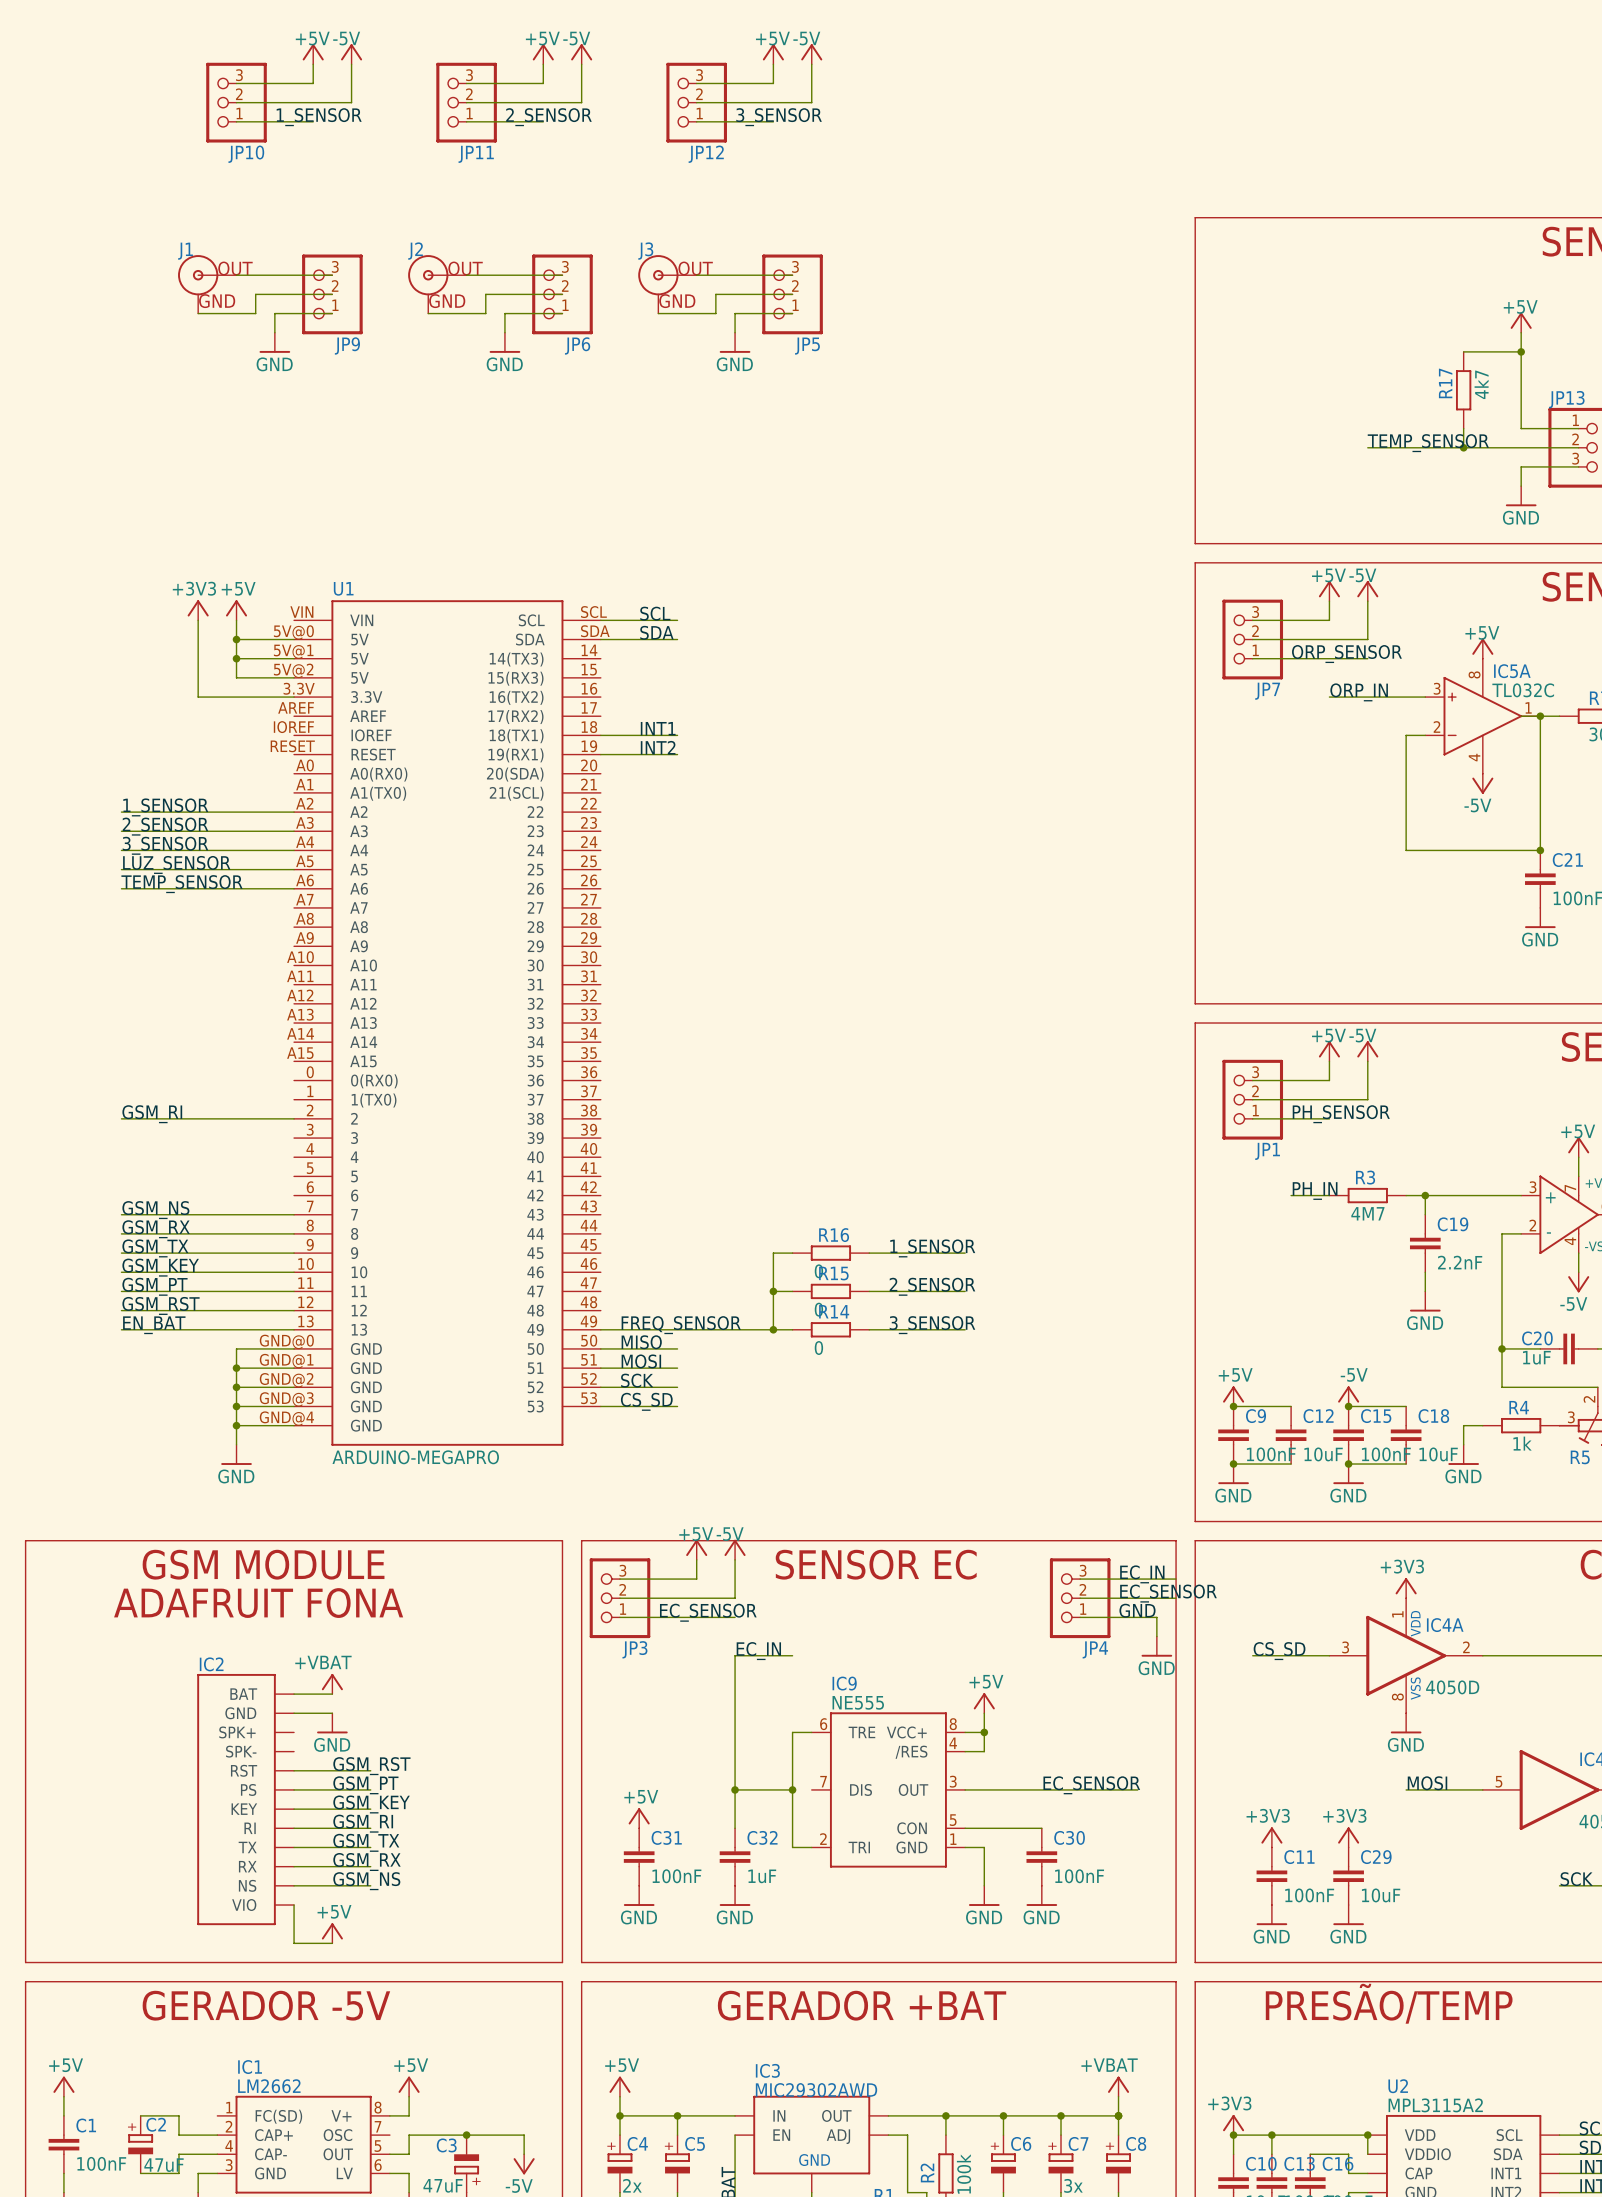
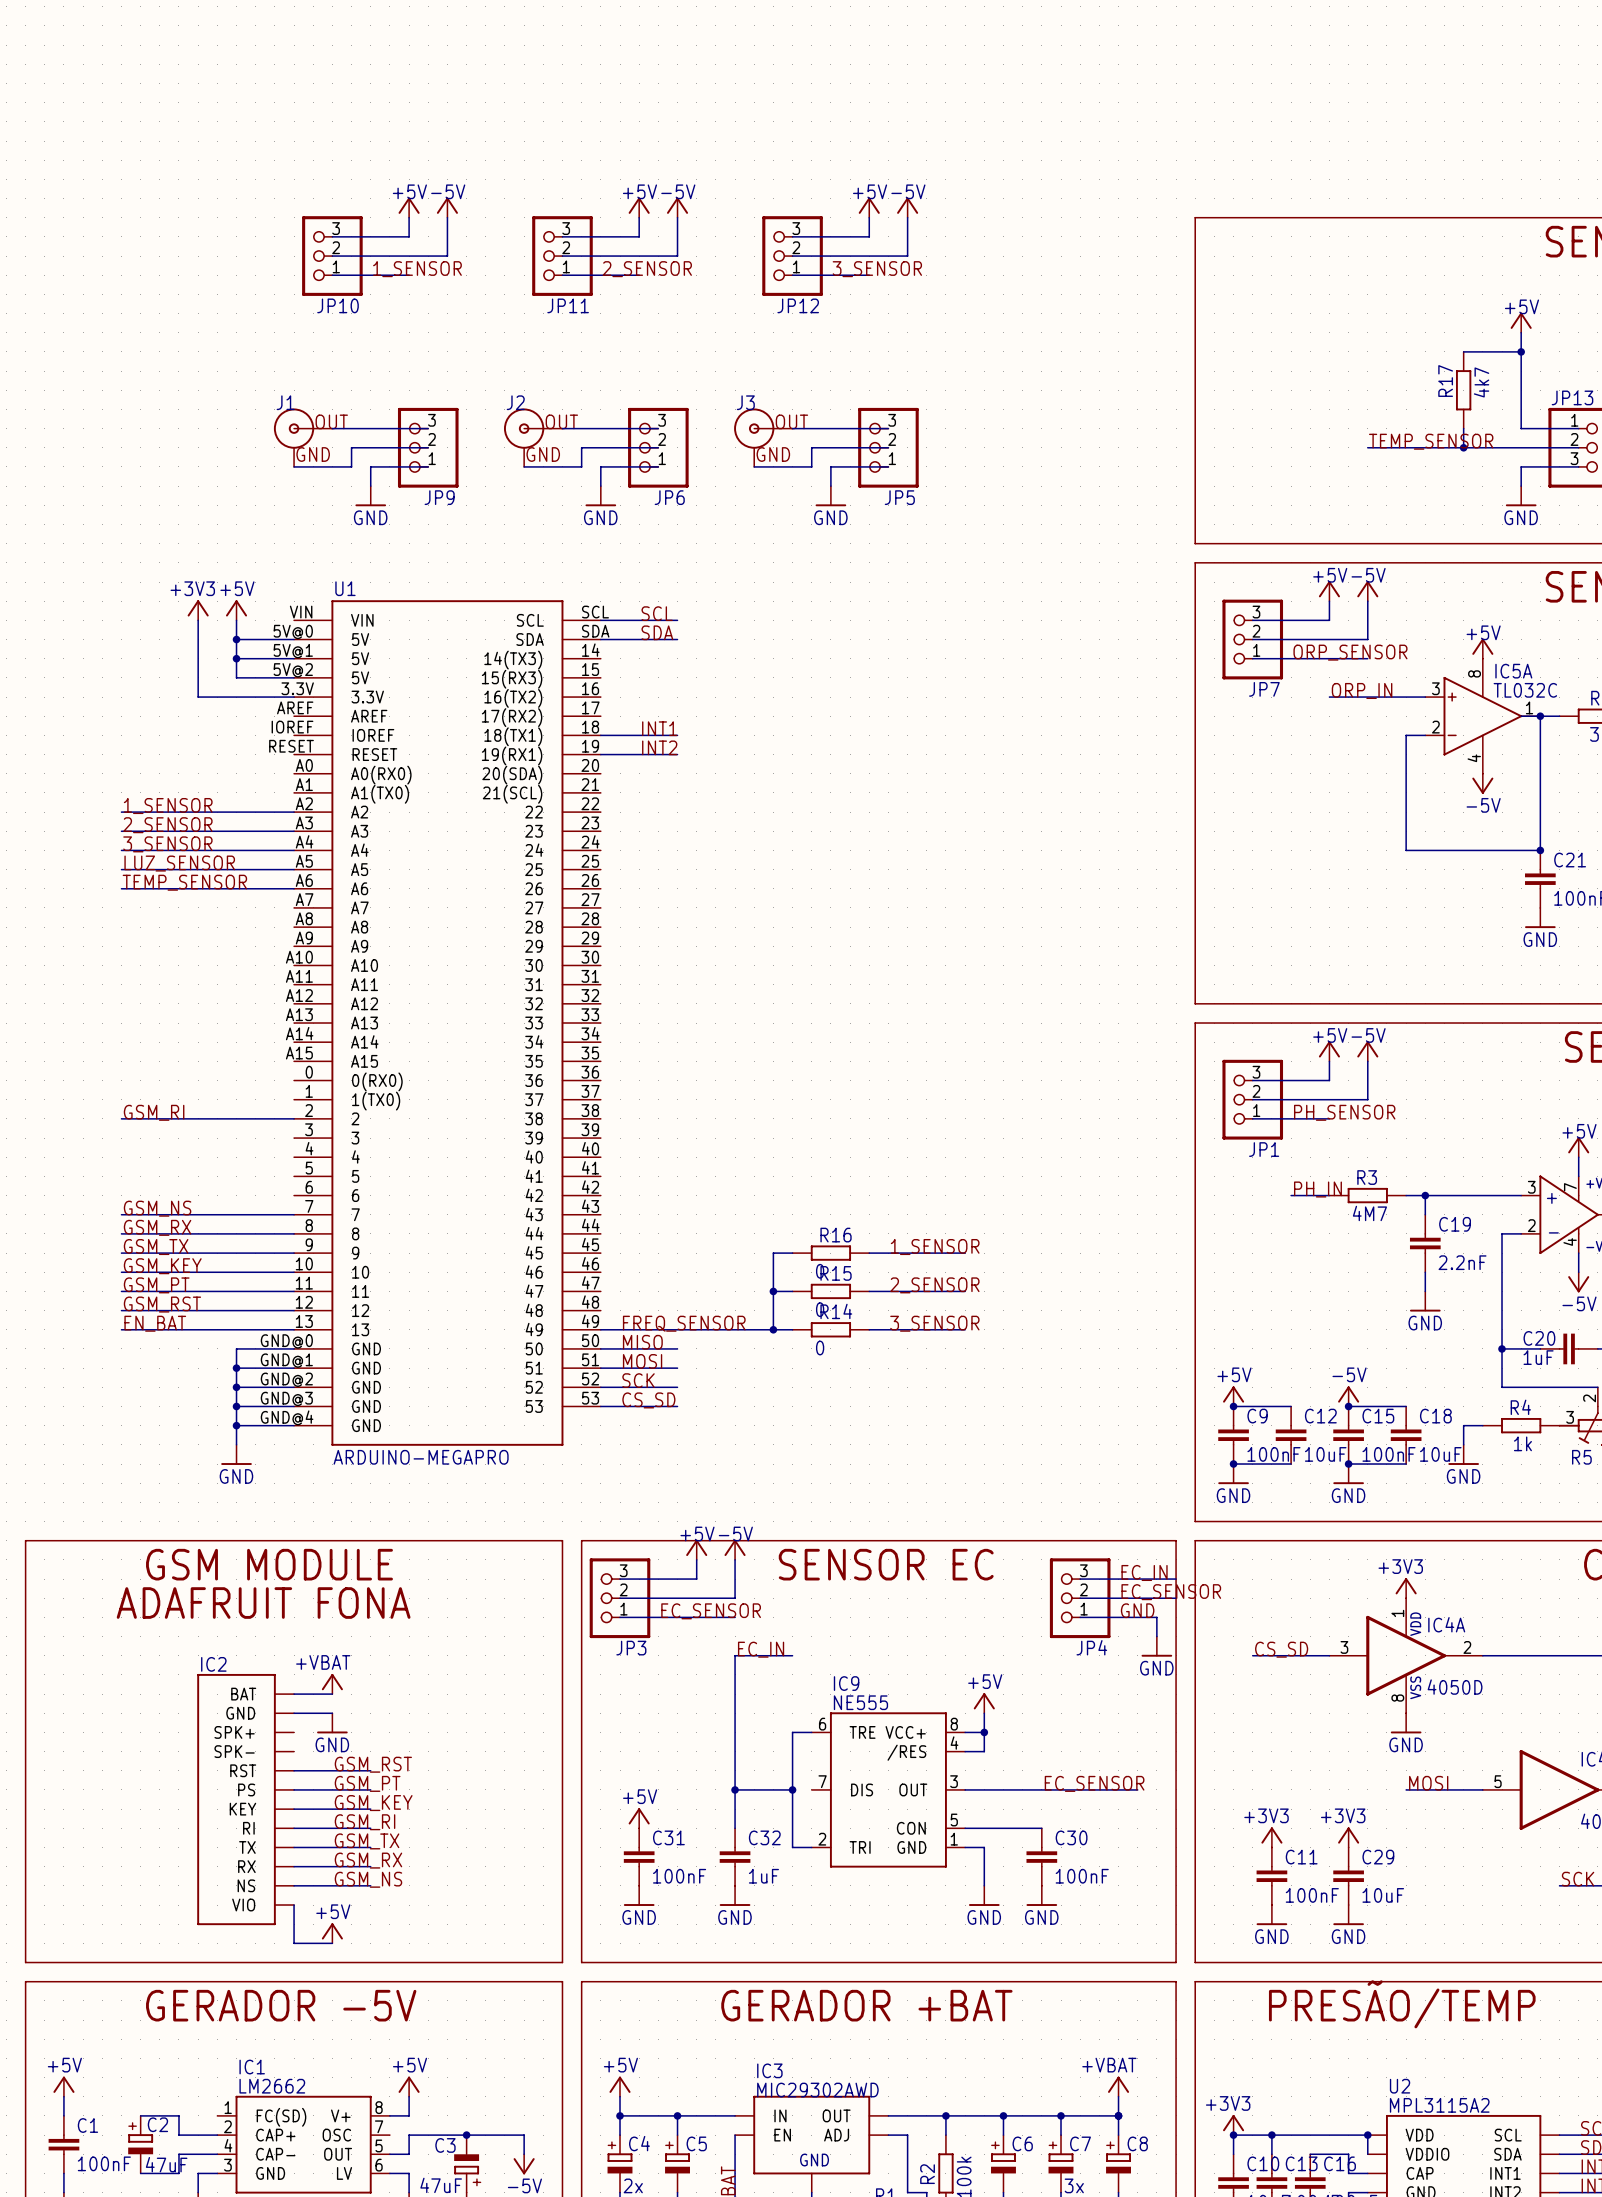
power symbol: +5V (313, 54) -> none
power symbol: -5V (351, 54) -> none
power symbol: +5V (543, 54) -> none
power symbol: -5V (581, 54) -> none
power symbol: +5V (773, 54) -> none
power symbol: -5V (811, 54) -> none
wire: (313, 64) (313, 83) (236, 83) -> (409, 217) (409, 236) (332, 236)
wire: (351, 64) (351, 102) (236, 102) -> (447, 217) (447, 256) (332, 256)
wire: (543, 64) (543, 83) (466, 83) -> (639, 217) (639, 236) (562, 236)
wire: (581, 64) (581, 102) (466, 102) -> (677, 217) (677, 256) (562, 256)
wire: (773, 64) (773, 83) (696, 83) -> (869, 217) (869, 236) (792, 236)
wire: (811, 64) (811, 102) (696, 102) -> (907, 217) (907, 256) (792, 256)
JP10 position: (236, 102) -> (332, 256)
JP11 position: (466, 102) -> (562, 256)
JP12 position: (696, 102) -> (792, 256)
label position: 1_SENSOR (319, 117) -> 1_SENSOR (417, 269)
label position: 2_SENSOR (548, 117) -> 2_SENSOR (647, 269)
label position: 3_SENSOR (779, 117) -> 3_SENSOR (877, 269)
wire: (236, 121) (313, 121) -> none
wire: (466, 121) (543, 121) -> none
wire: (696, 121) (773, 121) -> none
power symbol: none -> +5V (409, 207)
power symbol: none -> -5V (447, 207)
power symbol: none -> +5V (639, 207)
power symbol: none -> -5V (677, 207)
power symbol: none -> +5V (869, 207)
power symbol: none -> -5V (907, 207)
wire: (236, 275) (332, 275) -> (409, 275) (332, 275)
wire: (466, 275) (562, 275) -> (639, 275) (562, 275)
wire: (696, 275) (792, 275) -> (869, 275) (792, 275)
J1 position: (207, 284) -> (303, 437)
J2 position: (437, 284) -> (533, 437)
J3 position: (667, 284) -> (763, 437)
wire: (332, 294) (255, 294) (255, 313) (198, 313) -> (428, 447) (351, 447) (351, 466) (294, 466)
JP9 position: (332, 294) -> (428, 447)
wire: (562, 294) (485, 294) (485, 313) (428, 313) -> (658, 447) (581, 447) (581, 466) (524, 466)
JP6 position: (562, 294) -> (658, 447)
wire: (792, 294) (715, 294) (715, 313) (658, 313) -> (888, 447) (811, 447) (811, 466) (754, 466)
JP5 position: (792, 294) -> (888, 447)
wire: (332, 313) (274, 313) (274, 332) -> (428, 466) (370, 466) (370, 486)
wire: (562, 313) (504, 313) (504, 332) -> (658, 466) (600, 466) (600, 486)
wire: (792, 313) (735, 313) (735, 332) -> (888, 466) (830, 466) (830, 486)
power symbol: GND (274, 342) -> none
power symbol: GND (504, 342) -> none
power symbol: GND (735, 342) -> none
wire: none -> (332, 428) (428, 428)
wire: none -> (562, 428) (658, 428)
wire: none -> (792, 428) (888, 428)
power symbol: none -> GND (370, 496)
power symbol: none -> GND (600, 496)
power symbol: none -> GND (830, 496)

